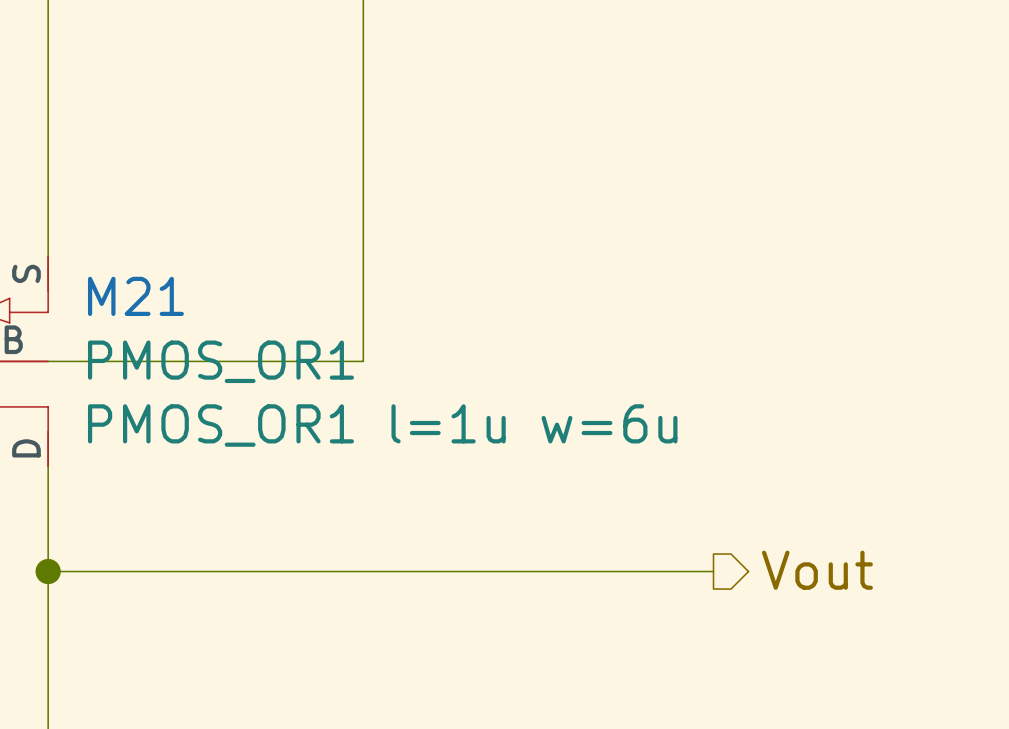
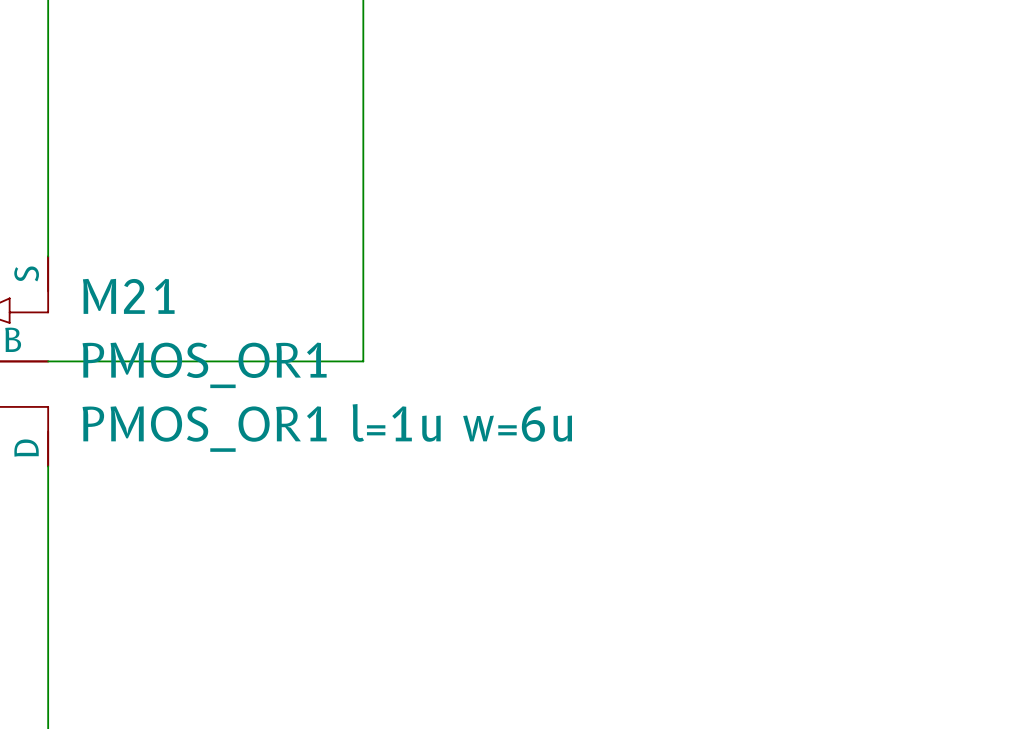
hierarchical label: Vout (817, 570) -> none
wire: (48, 571) (713, 571) -> none
junction: (48, 571) -> none

